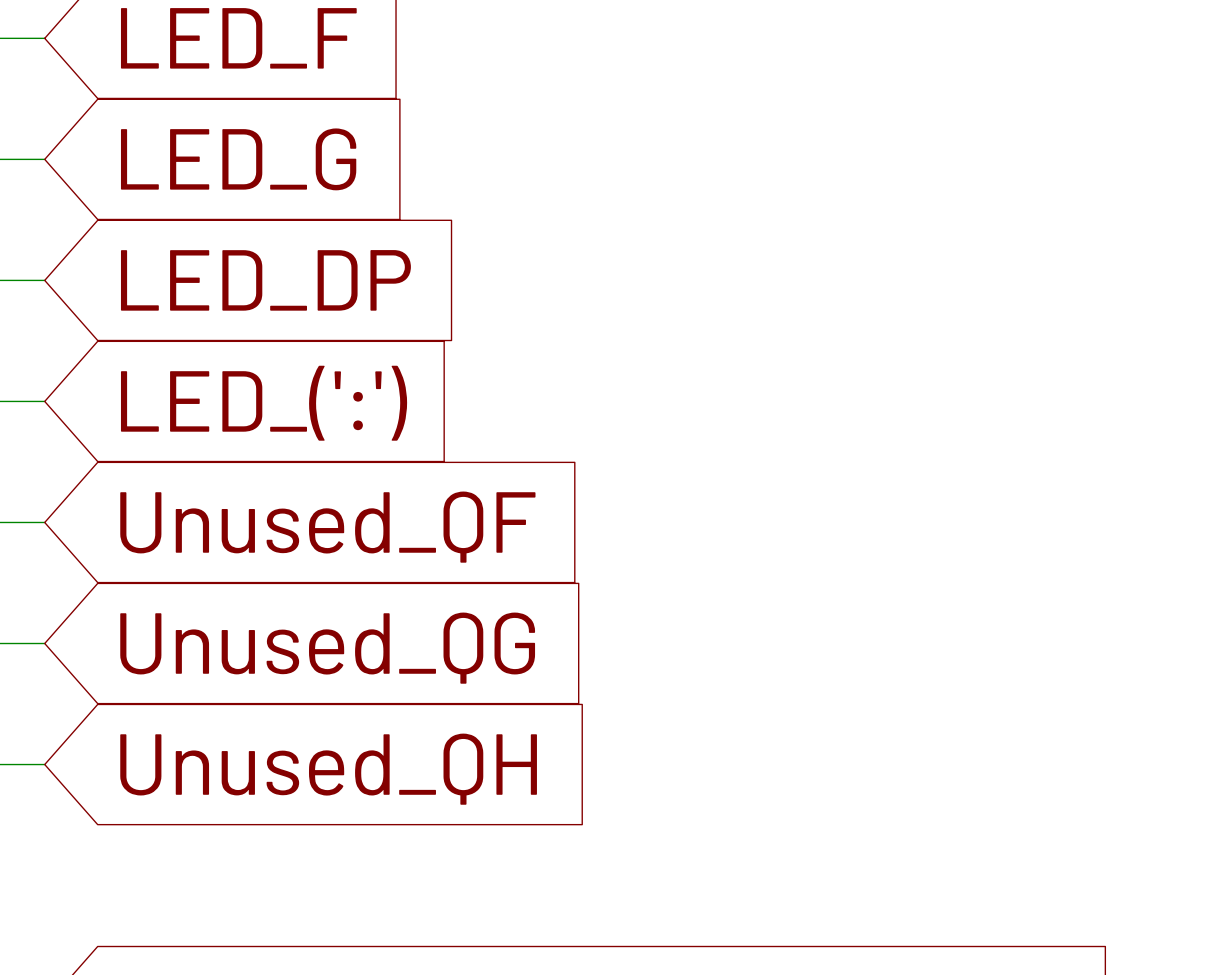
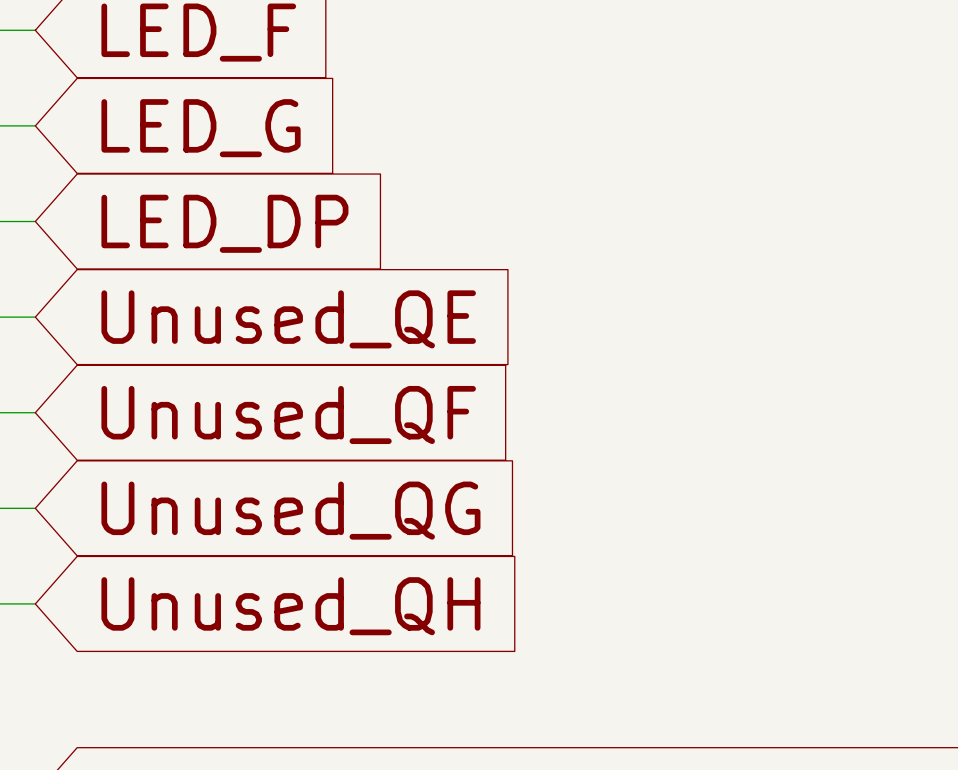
global label: LED_(':') (264, 403) -> Unused_QE (288, 319)

